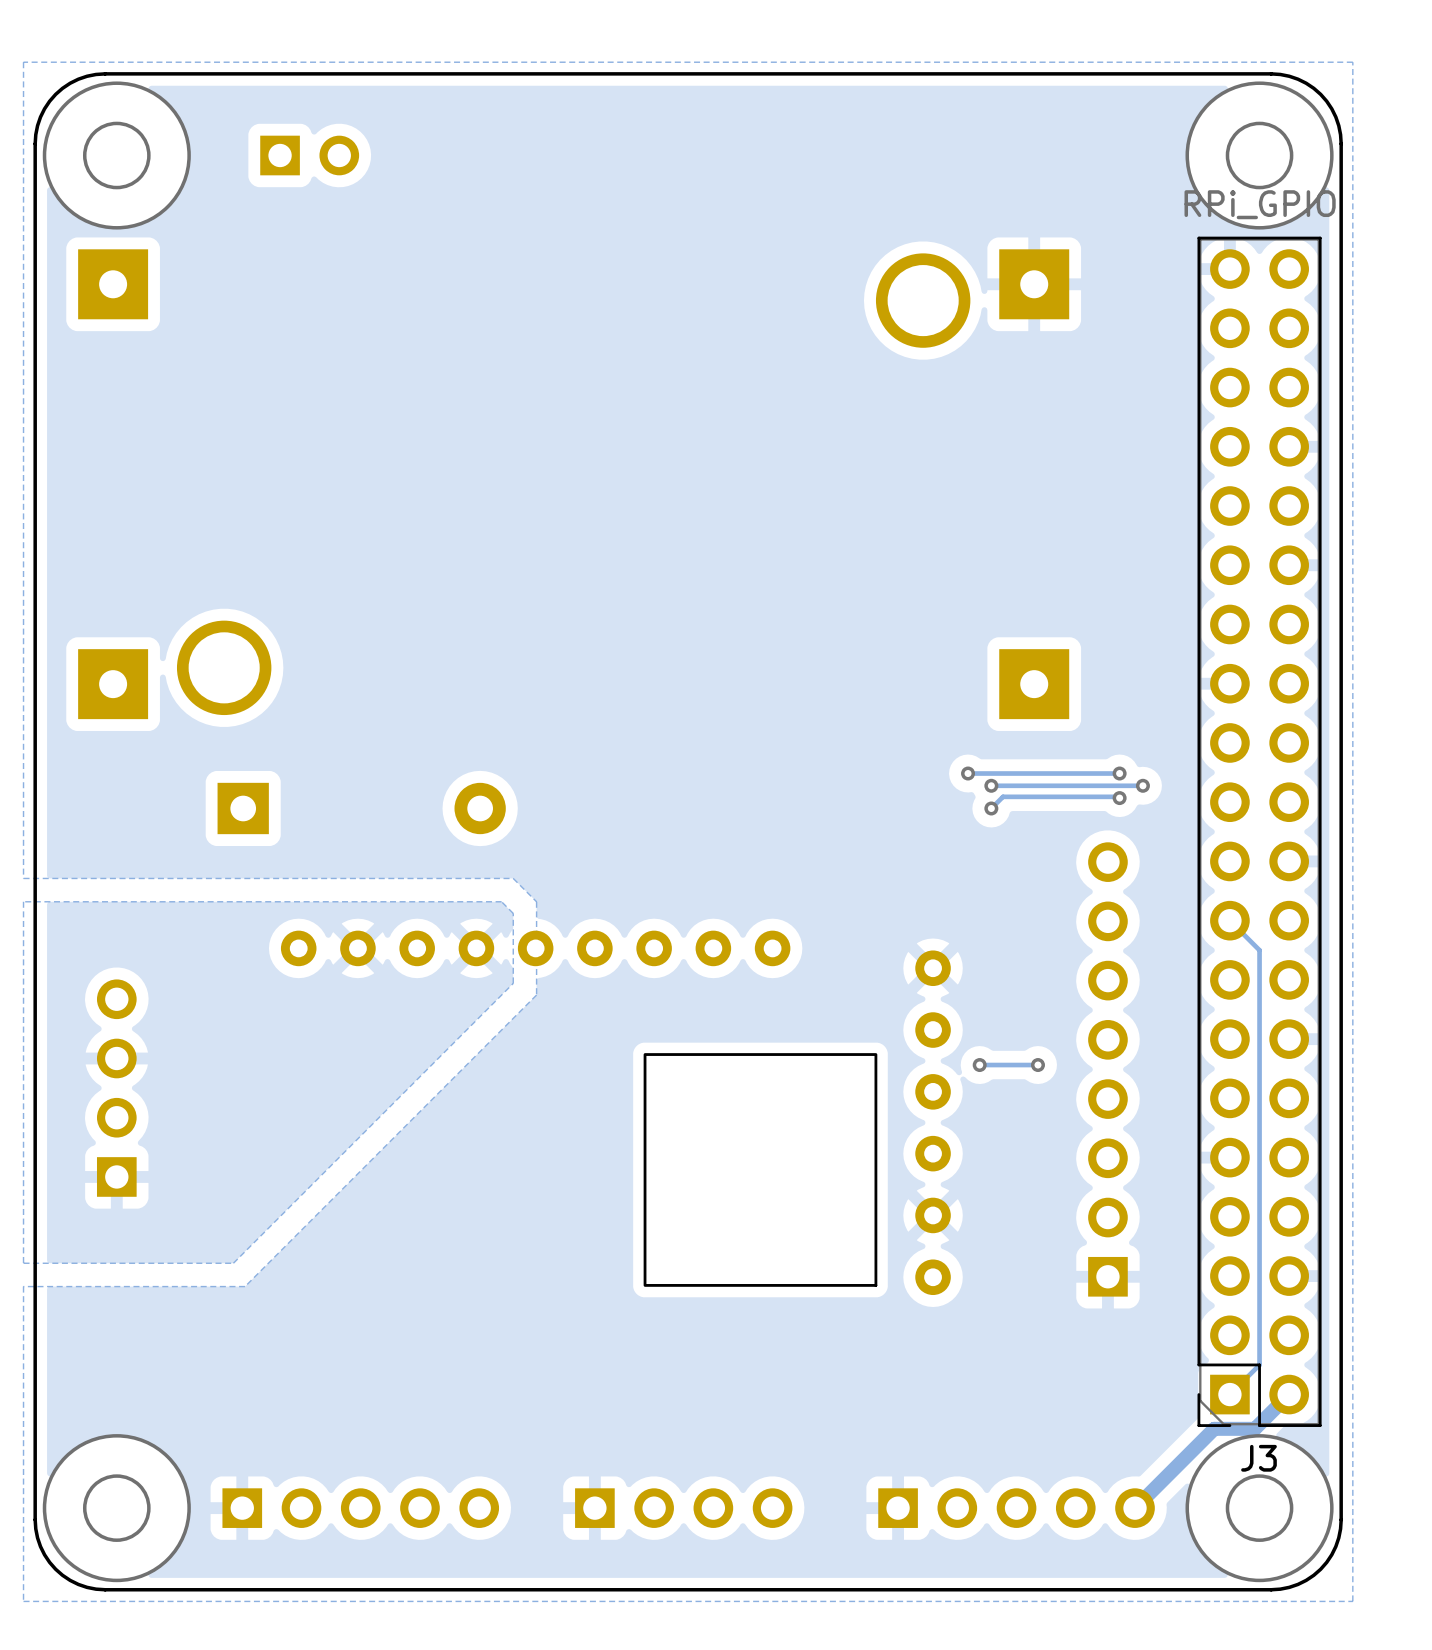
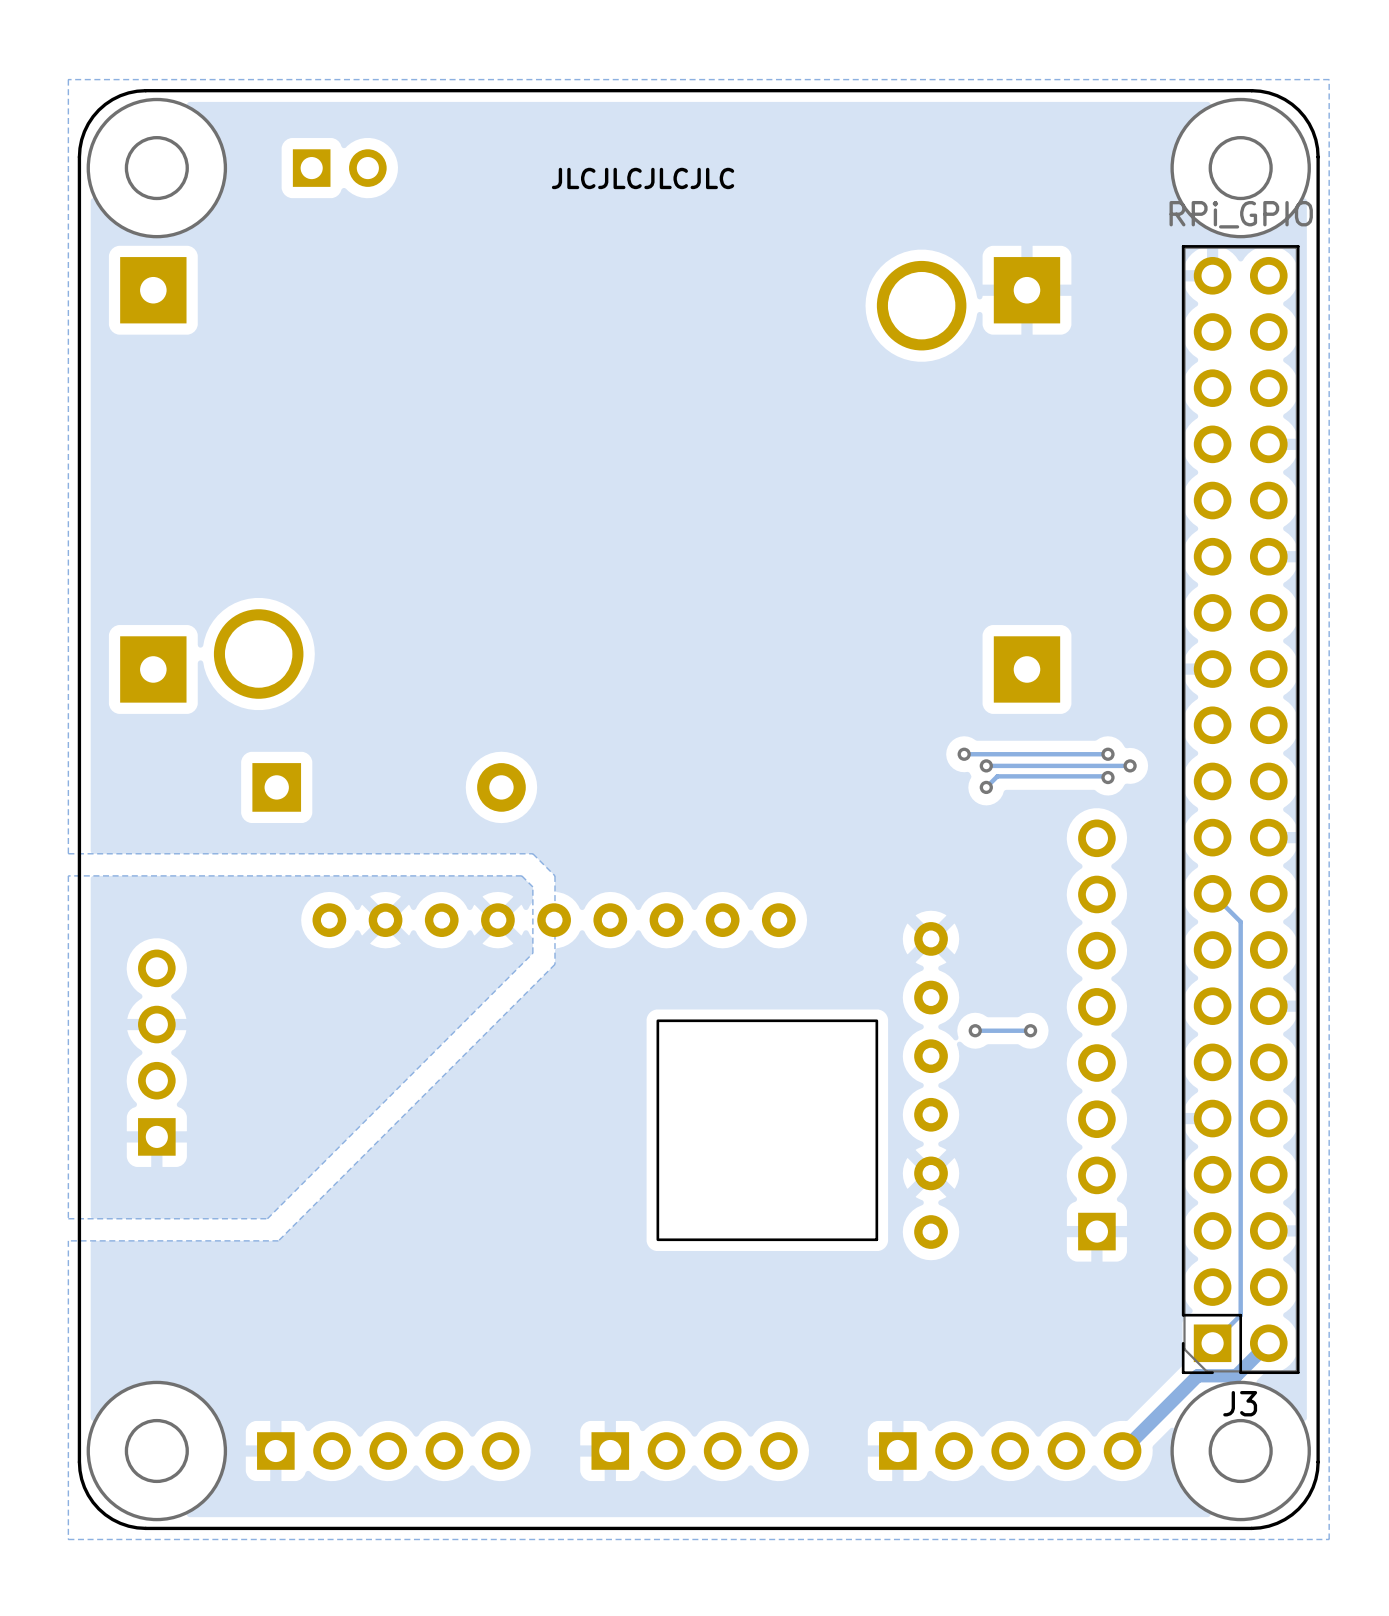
text: none -> JLCJLCJLCJLC (643, 178)

